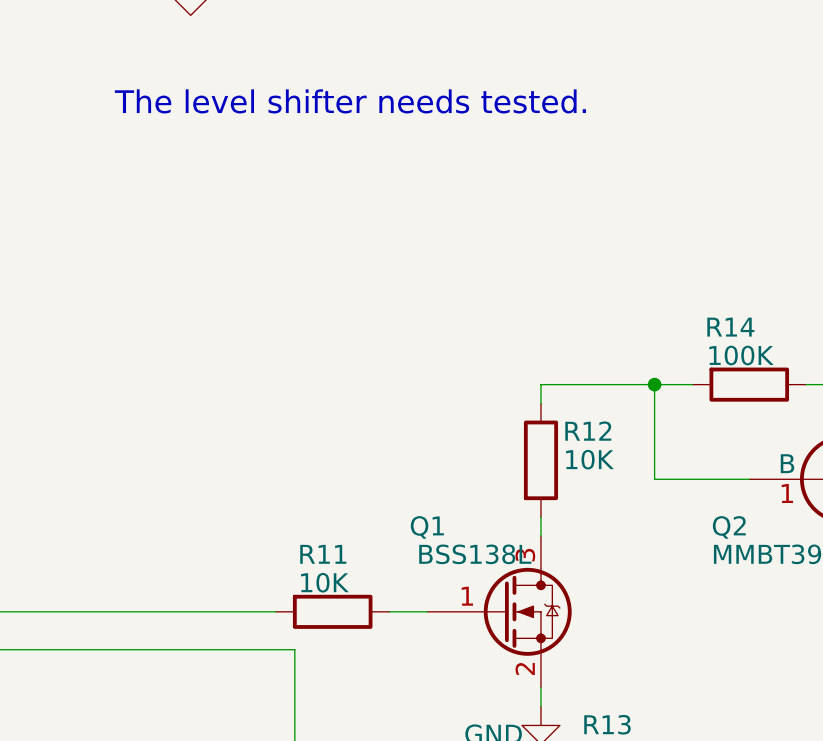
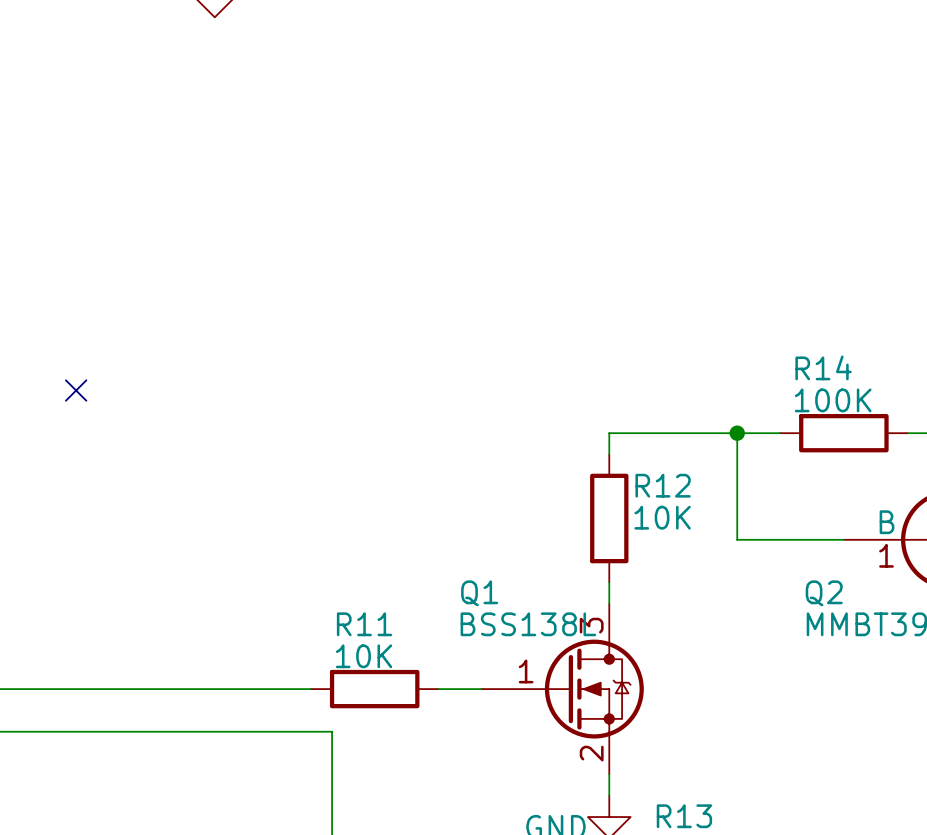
text: The level shifter needs tested. (350, 101) -> none
no-connect mark: none -> (76, 390)

